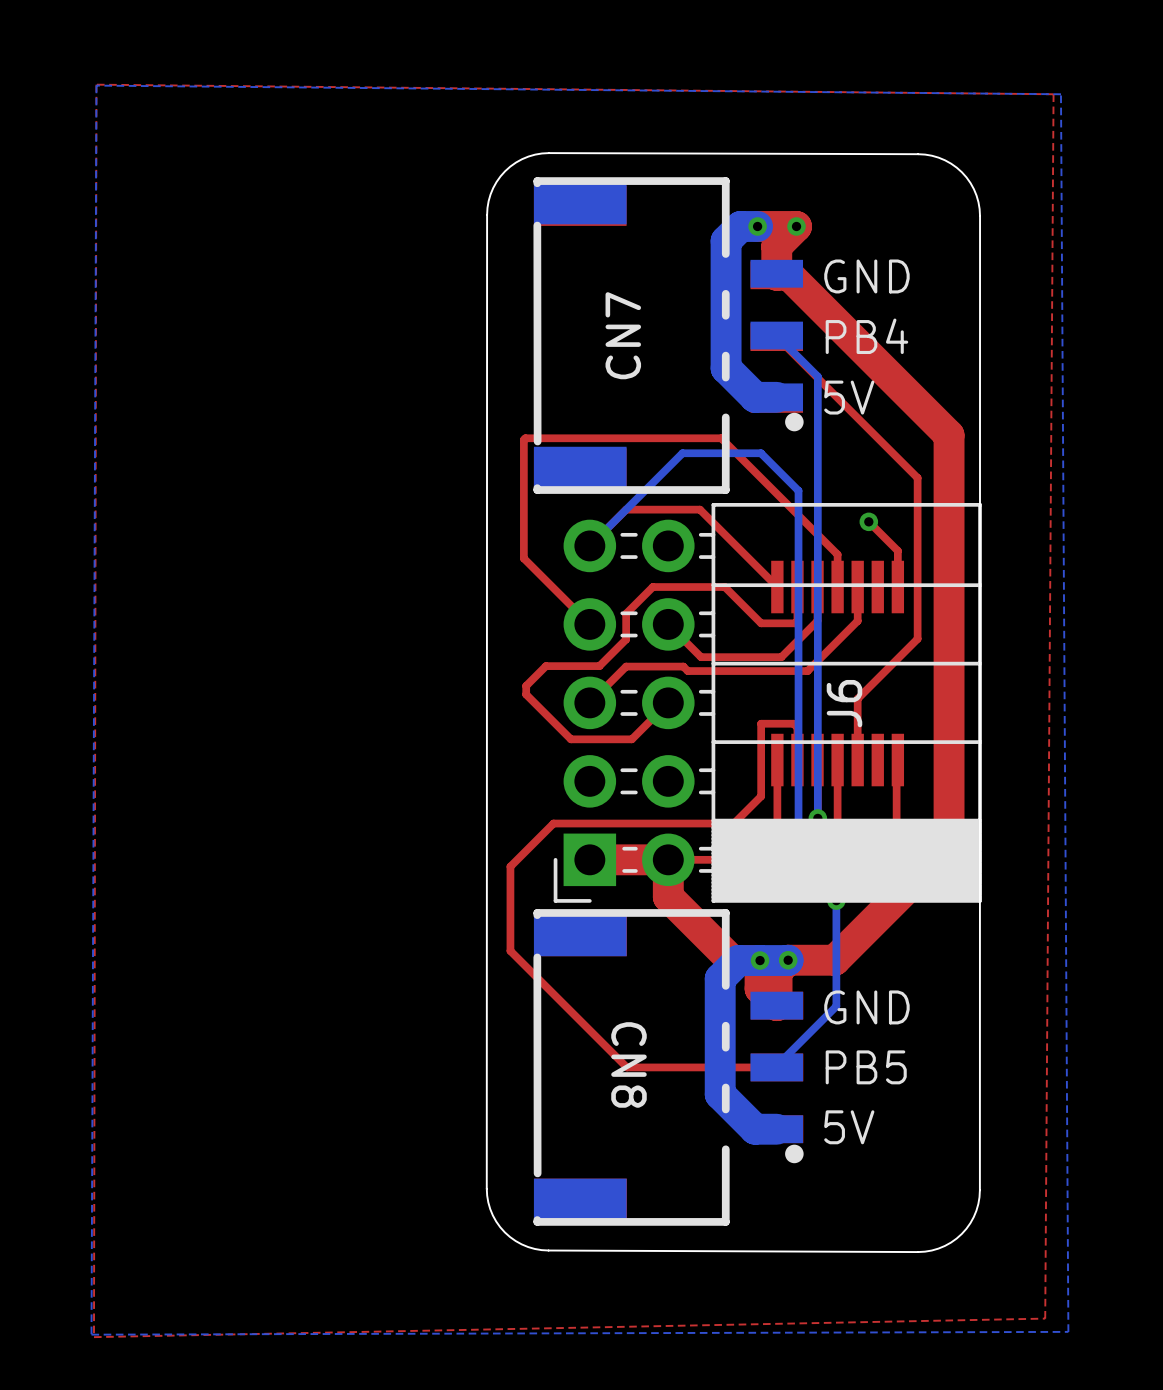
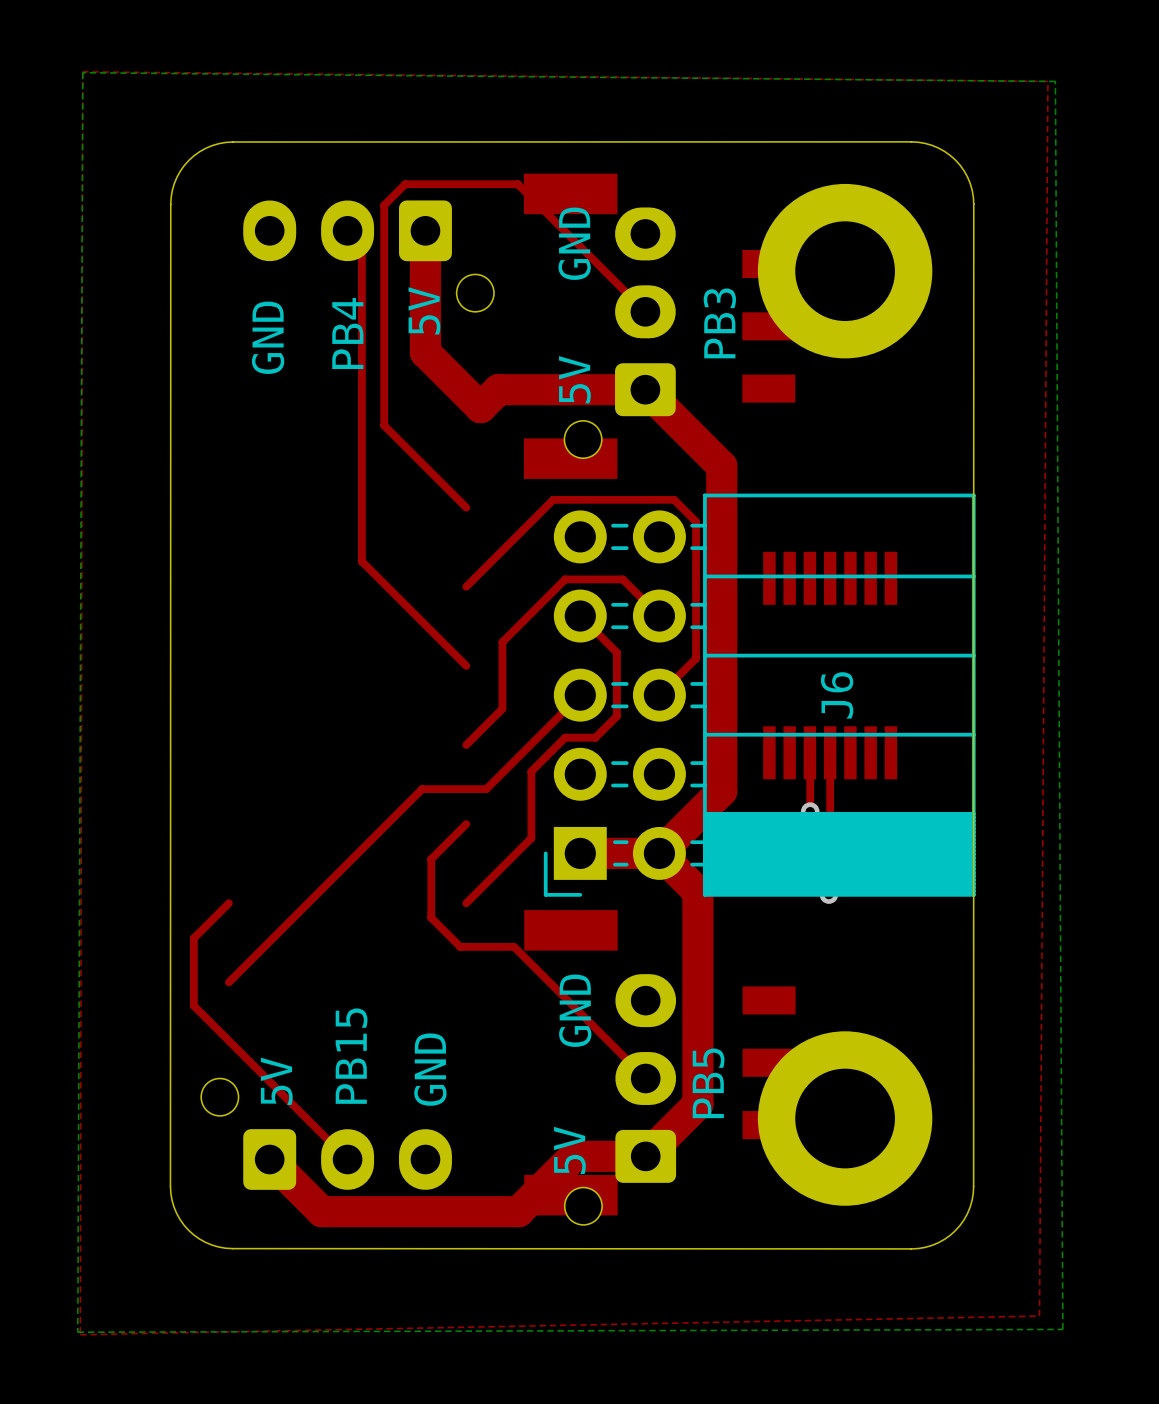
board edge: (918, 154) (541, 153) (528, 156) (516, 162) (500, 176) (493, 188) (488, 201) (487, 214) (486, 1188) (490, 1209) (500, 1227) (510, 1237) (521, 1244) (541, 1250) (918, 1252) -> (911, 141) (233, 142) (219, 143) (206, 148) (194, 155) (180, 171) (172, 190) (170, 204) (170, 1186) (173, 1206) (180, 1219) (188, 1230) (205, 1242) (225, 1248) (911, 1248)
top track: (757, 226) (796, 226) (776, 246) (776, 275) (789, 275) (949, 435) (949, 846) (834, 960) (788, 960) (777, 971) (777, 1005) (760, 988) (760, 960) (731, 960) (668, 896) (668, 859) (741, 859) (777, 823) (777, 760) -> none
bottom track: (757, 226) (740, 226) (726, 241) (726, 368) (755, 397) (776, 397) -> none
via: (757, 226) -> none
via: (796, 226) -> none
top track: none -> (361, 231) (361, 561) (466, 665)
top track: none -> (425, 230) (425, 352) (480, 407) (498, 389) (645, 389) (721, 466) (721, 791) (659, 853) (697, 891) (697, 1104) (645, 1156) (573, 1156) (518, 1211) (321, 1211) (269, 1159)
part: none -> (368, 256)
text rotation: 0° (866, 276) -> 90° counterclockwise (574, 243)
text position: GND (866, 276) -> GND (574, 243)
part: none -> (845, 271)
text: none -> 5V (424, 310)
top track: none -> (645, 311) (517, 184) (405, 184) (384, 205) (384, 425) (466, 507)
text: none -> PB3 (719, 323)
CN7: (668, 335) -> none
bottom track: (776, 335) (817, 376) (817, 818) -> none
text rotation: 0° (866, 336) -> 90° counterclockwise (347, 333)
text position: PB4 (866, 336) -> PB4 (347, 333)
text: none -> GND (268, 337)
top track: (776, 337) (917, 477) (917, 638) (857, 698) (857, 760) -> none
part: none -> (620, 332)
text: none -> 5V (574, 379)
text: 5V (849, 397) -> none
top track: (868, 521) (897, 550) (897, 587) -> none
via: (868, 521) -> none
top track: (589, 545) (626, 509) (699, 509) (777, 587) -> none
bottom track: (589, 545) (682, 453) (760, 453) (798, 490) (798, 828) (807, 837) (887, 837) (896, 828) -> none
top track: (797, 587) (797, 621) (795, 623) (761, 623) (724, 587) (652, 587) (626, 613) (626, 639) (599, 666) (545, 666) (526, 685) (526, 694) (570, 739) (631, 739) (668, 702) -> (466, 586) (553, 499) (674, 499) (696, 521) (696, 658) (659, 695)
top track: (817, 587) (817, 621) (781, 657) (701, 657) (668, 624) -> (466, 745) (502, 708) (502, 642) (565, 579) (622, 579) (659, 616)
top track: (837, 587) (837, 554) (721, 438) (525, 438) (523, 439) (523, 558) (589, 624) -> (466, 903) (531, 838) (531, 771) (565, 737) (595, 737) (616, 716) (616, 652) (580, 616)
top track: (857, 587) (857, 621) (807, 671) (687, 671) (683, 666) (626, 666) (589, 702) -> (228, 982) (422, 789) (486, 789) (580, 695)
top track: (797, 760) (797, 727) (793, 723) (761, 723) (761, 796) (733, 823) (553, 823) (510, 866) (510, 950) (626, 1067) (777, 1067) -> none
top track: (897, 760) (896, 828) -> none
top track: none -> (466, 824) (431, 859) (431, 917) (460, 946) (514, 946) (645, 1078)
bottom track: (836, 900) (836, 1006) (776, 1067) -> none
top track: none -> (228, 903) (193, 938) (193, 1005) (347, 1159)
via: (760, 960) -> none
bottom track: (787, 960) (738, 960) (720, 978) (720, 1094) (755, 1129) (776, 1129) -> none
via: (788, 960) -> none
text: none -> GND (575, 1010)
text: GND (866, 1007) -> none
text: none -> PB15 (351, 1056)
text: none -> GND (430, 1069)
CN8: (668, 1067) -> none
text rotation: 0° (866, 1067) -> 90° counterclockwise (708, 1083)
text position: PB5 (866, 1067) -> PB5 (708, 1083)
text: none -> 5V (276, 1081)
part: none -> (620, 1099)
part: none -> (845, 1118)
text rotation: 0° (849, 1127) -> 90° counterclockwise (569, 1150)
text position: 5V (849, 1127) -> 5V (569, 1150)
part: none -> (326, 1134)

